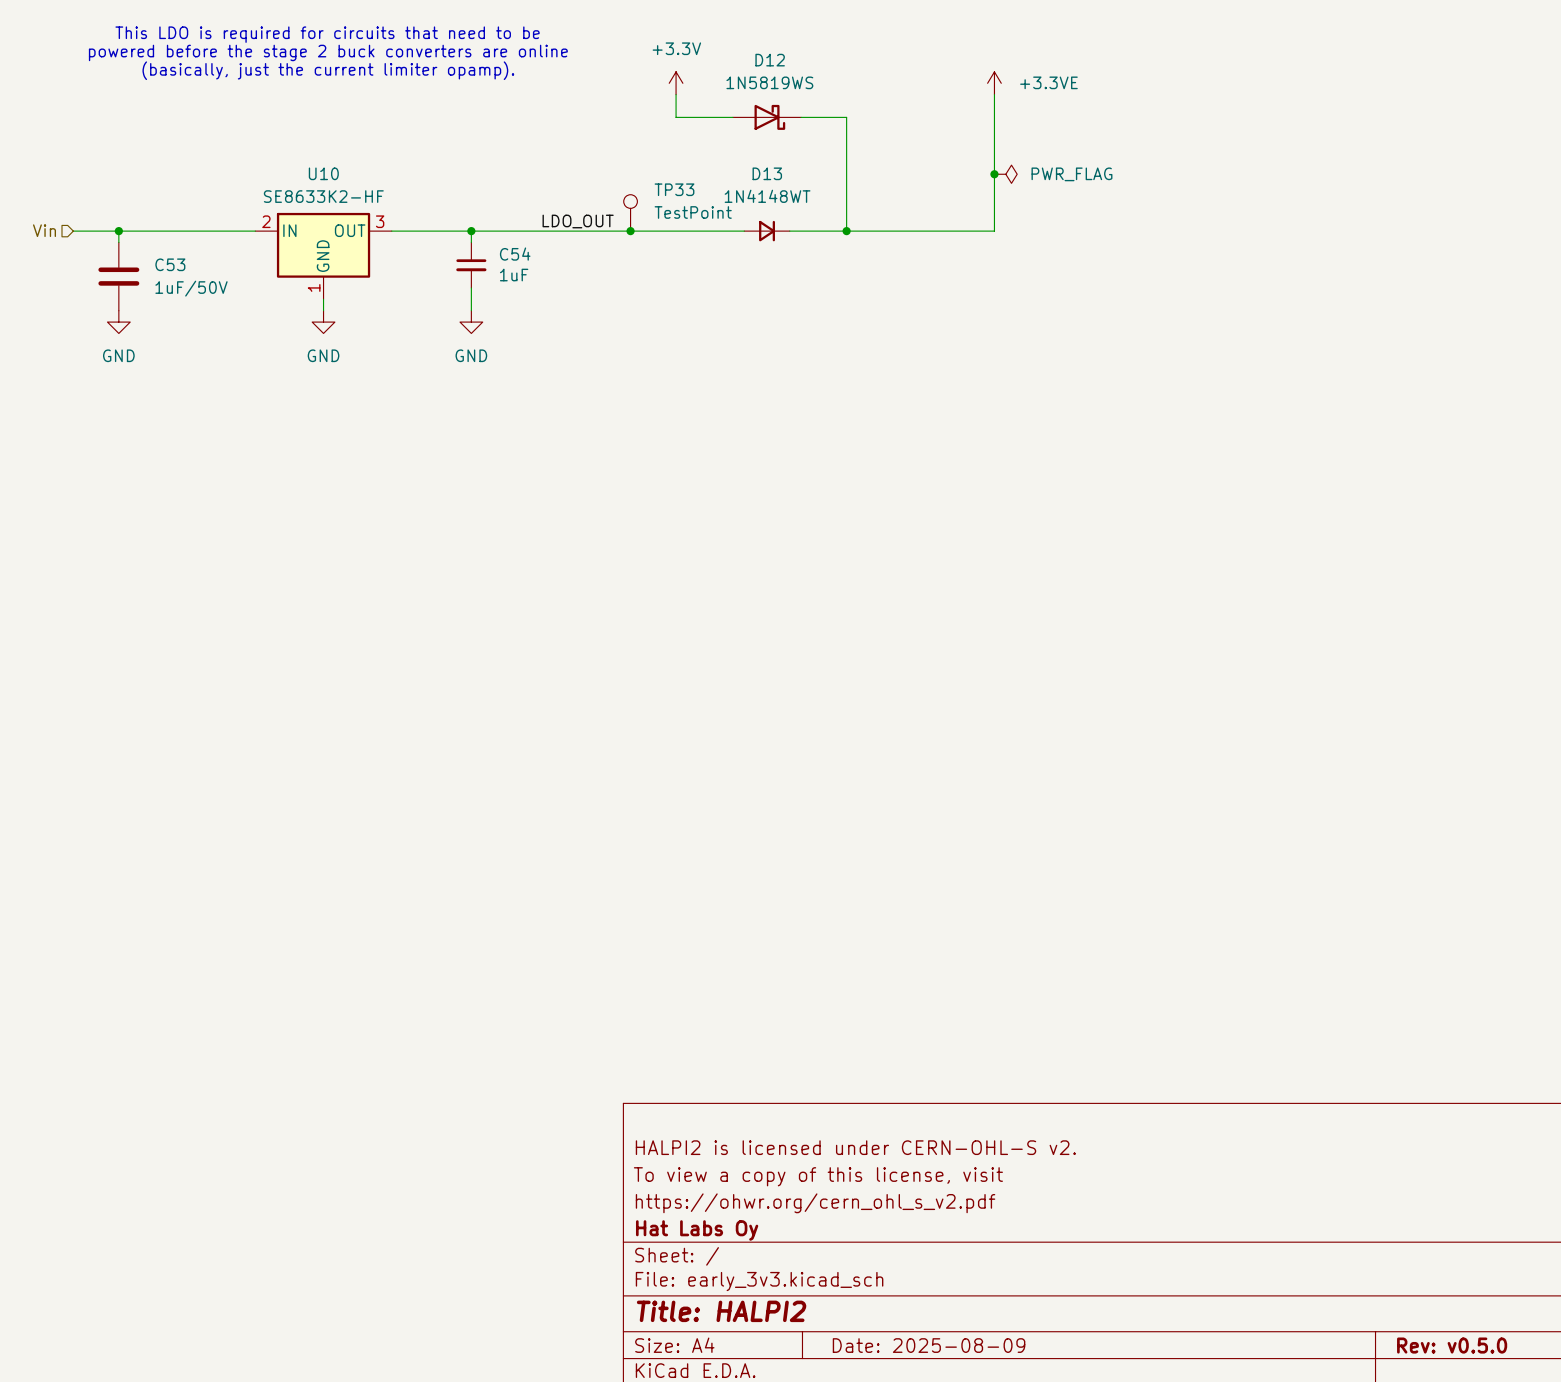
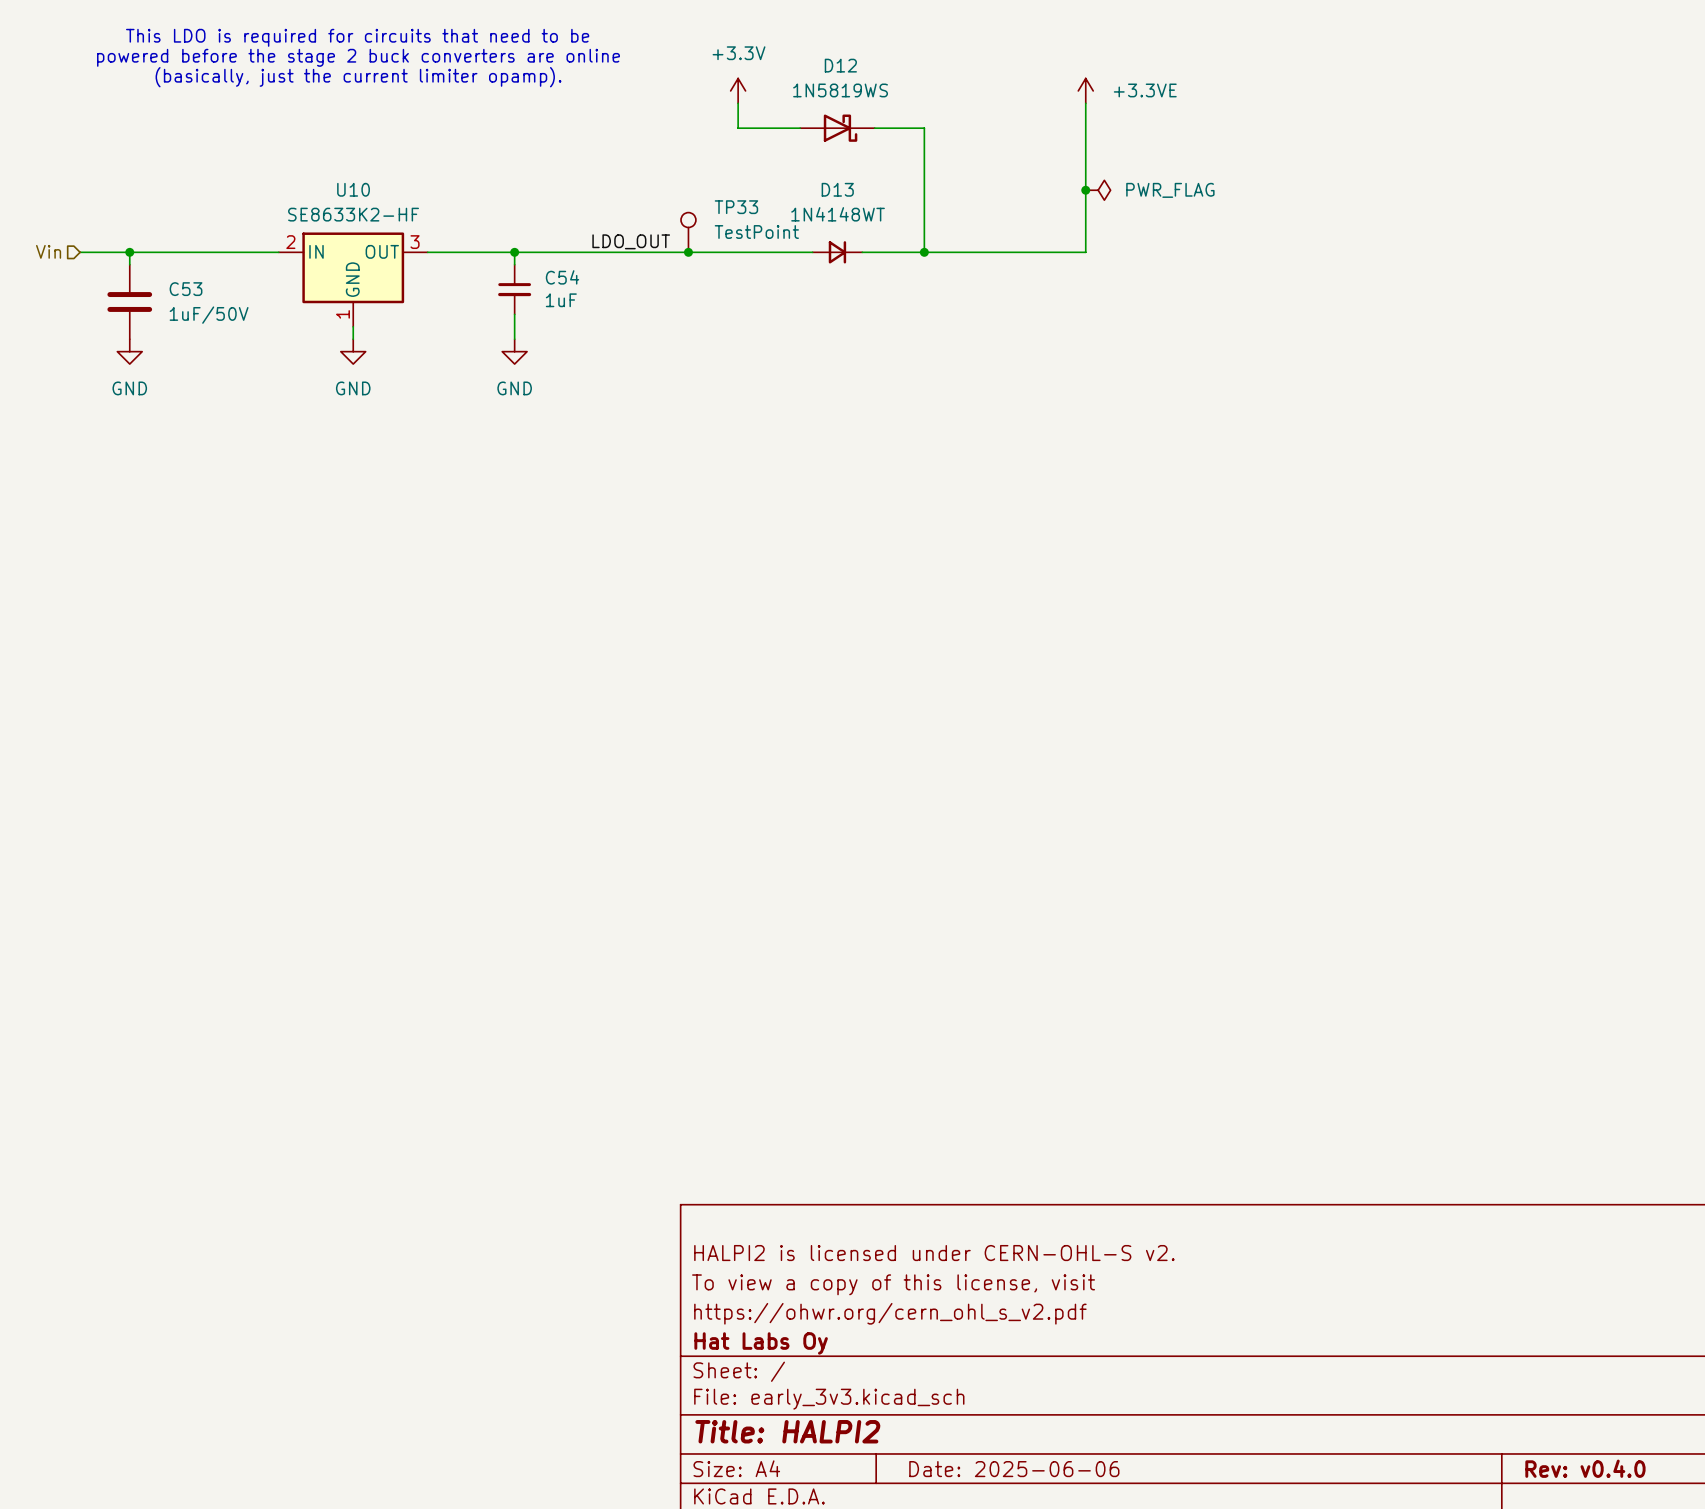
title block: Date: 2025-08-09 (929, 1345) -> Date: 2025-06-06 (1014, 1469)
title block: Rev: v0.5.0 (1452, 1345) -> Rev: v0.4.0 (1585, 1468)

